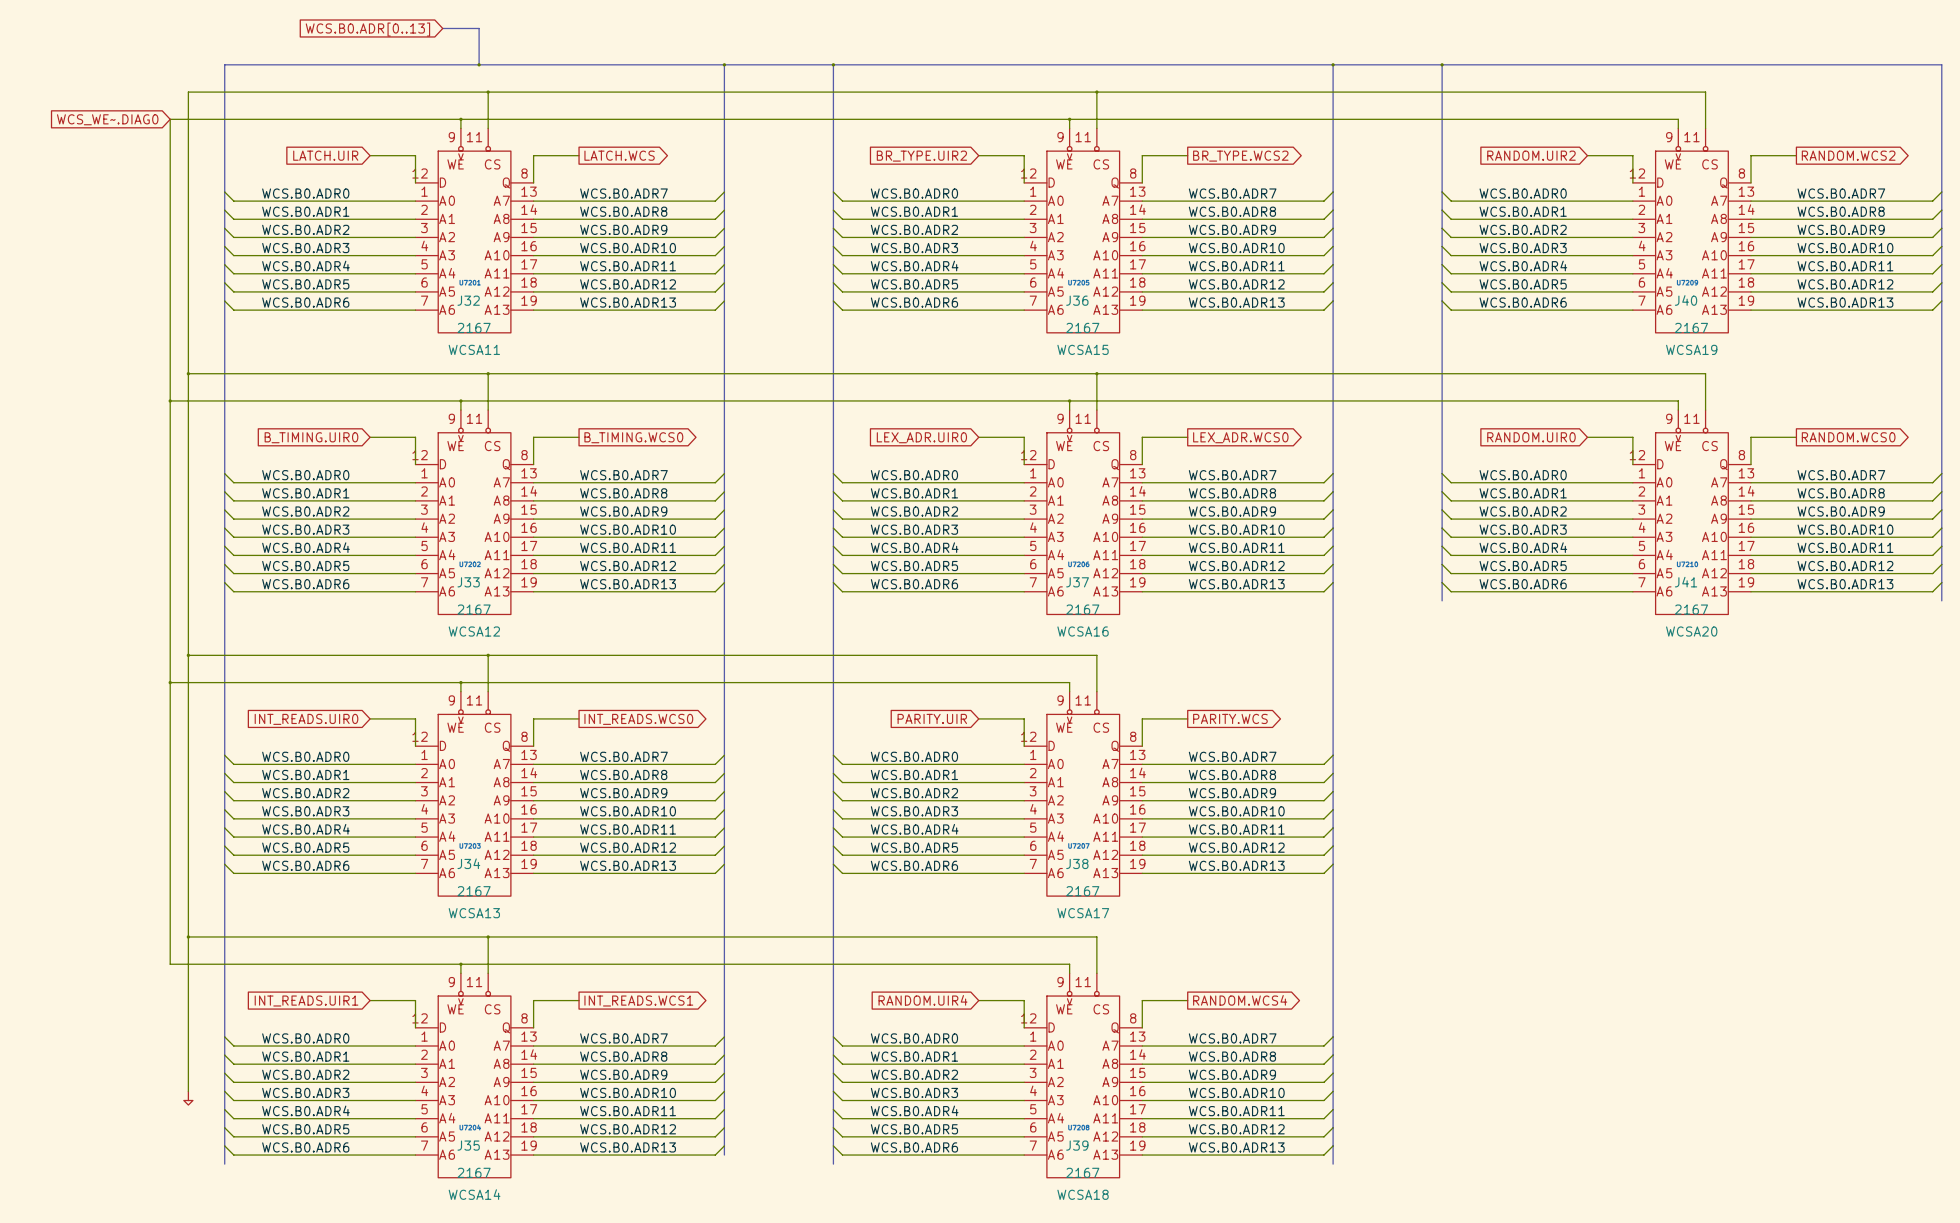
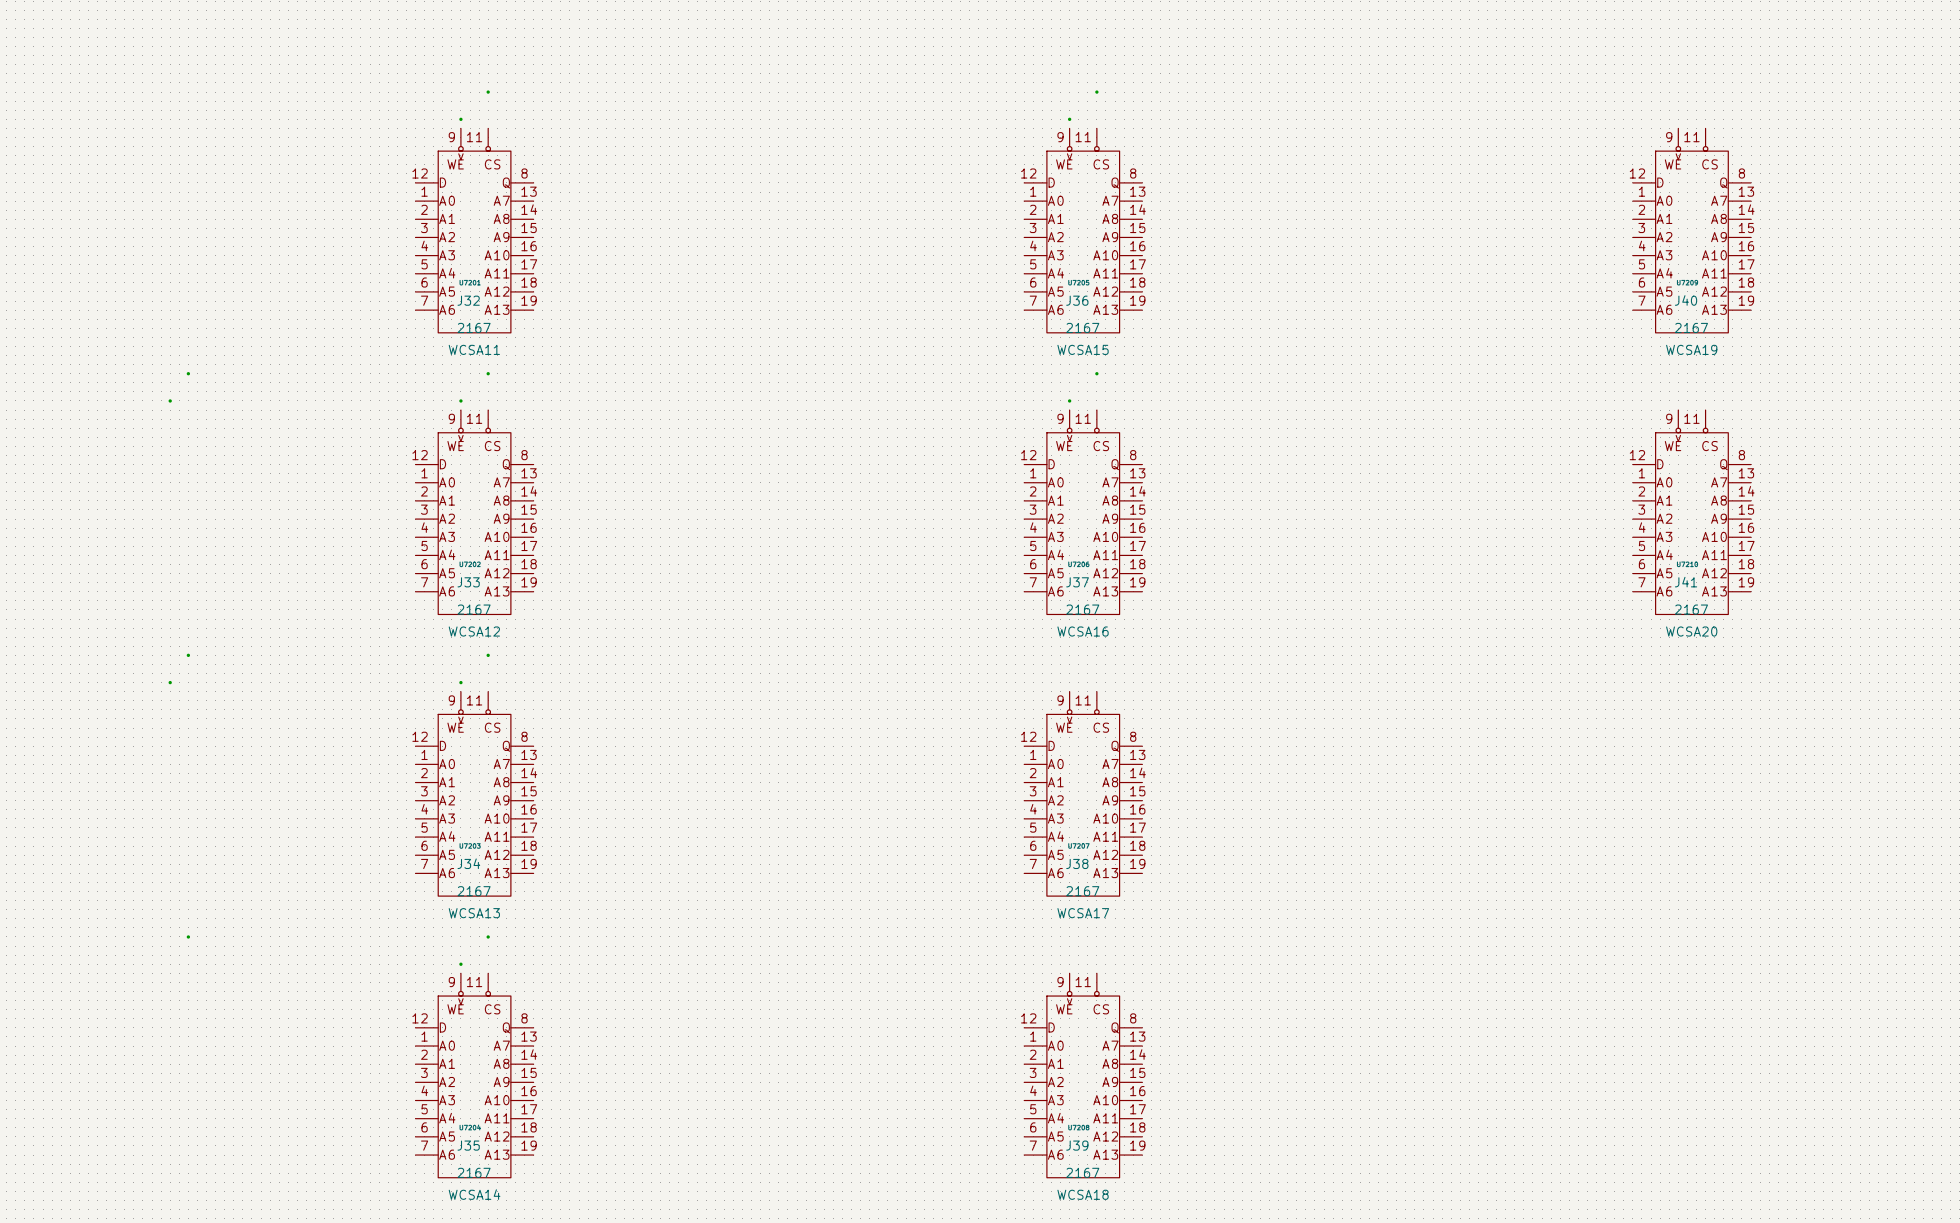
bus: (442, 28) (479, 28) (479, 64) -> none
global label: WCS.B0.ADR[0..13] (367, 29) -> none
junction: (479, 64) -> none
bus: (724, 64) (724, 1155) -> none
junction: (724, 64) -> none
bus: (833, 64) (833, 1164) -> none
junction: (833, 64) -> none
bus: (1333, 64) (1333, 1164) -> none
junction: (1333, 64) -> none
bus: (1442, 64) (1442, 600) -> none
junction: (1442, 64) -> none
wire: (488, 92) (488, 128) -> none
wire: (1096, 92) (1096, 128) -> none
global label: WCS_WE~.DIAG0 (107, 119) -> none
wire: (460, 119) (460, 128) -> none
wire: (1069, 119) (1069, 128) -> none
wire: (1678, 128) (1678, 119) (170, 119) (170, 964) (1069, 964) (1069, 973) -> none
wire: (1705, 128) (1705, 92) (188, 92) (188, 1091) -> none
global label: LATCH.UIR (325, 155) -> none
wire: (370, 155) (415, 155) (415, 182) -> none
wire: (579, 155) (533, 155) (533, 182) -> none
global label: LATCH.WCS (619, 155) -> none
wire: (978, 155) (1024, 155) (1024, 182) -> none
wire: (1187, 155) (1142, 155) (1142, 182) -> none
global label: RANDOM.UIR2 (1531, 155) -> none
wire: (1587, 155) (1632, 155) (1632, 182) -> none
wire: (1796, 155) (1751, 155) (1751, 182) -> none
global label: RANDOM.WCS2 (1848, 155) -> none
global label: BR_TYPE.UIR2 (921, 156) -> none
global label: BR_TYPE.WCS2 (1240, 156) -> none
wire: (224, 192) (233, 201) (415, 201) -> none
wire: (724, 192) (715, 201) (533, 201) -> none
wire: (833, 192) (842, 201) (1024, 201) -> none
wire: (1333, 192) (1324, 201) (1142, 201) -> none
wire: (1442, 192) (1451, 201) (1632, 201) -> none
wire: (1941, 192) (1932, 201) (1751, 201) -> none
label: WCS.B0.ADR0 (305, 193) -> none
label: WCS.B0.ADR7 (623, 193) -> none
label: WCS.B0.ADR0 (914, 193) -> none
label: WCS.B0.ADR7 (1232, 193) -> none
label: WCS.B0.ADR0 (1523, 193) -> none
label: WCS.B0.ADR7 (1841, 193) -> none
wire: (224, 210) (233, 219) (415, 219) -> none
wire: (724, 210) (715, 219) (533, 219) -> none
wire: (833, 210) (842, 219) (1024, 219) -> none
wire: (1333, 210) (1324, 219) (1142, 219) -> none
wire: (1442, 210) (1451, 219) (1632, 219) -> none
wire: (1941, 210) (1932, 219) (1751, 219) -> none
label: WCS.B0.ADR1 (305, 211) -> none
label: WCS.B0.ADR8 (623, 211) -> none
label: WCS.B0.ADR1 (914, 211) -> none
label: WCS.B0.ADR8 (1232, 211) -> none
label: WCS.B0.ADR1 (1523, 211) -> none
label: WCS.B0.ADR8 (1841, 211) -> none
wire: (224, 228) (233, 237) (415, 237) -> none
wire: (724, 228) (715, 237) (533, 237) -> none
wire: (833, 228) (842, 237) (1024, 237) -> none
wire: (1333, 228) (1324, 237) (1142, 237) -> none
wire: (1442, 228) (1451, 237) (1632, 237) -> none
wire: (1941, 228) (1932, 237) (1751, 237) -> none
label: WCS.B0.ADR2 (305, 229) -> none
label: WCS.B0.ADR9 (623, 229) -> none
label: WCS.B0.ADR2 (914, 229) -> none
label: WCS.B0.ADR9 (1232, 229) -> none
label: WCS.B0.ADR2 (1523, 229) -> none
label: WCS.B0.ADR9 (1841, 229) -> none
wire: (224, 246) (233, 255) (415, 255) -> none
wire: (724, 246) (715, 255) (533, 255) -> none
wire: (833, 246) (842, 255) (1024, 255) -> none
wire: (1333, 246) (1324, 255) (1142, 255) -> none
wire: (1442, 246) (1451, 255) (1632, 255) -> none
wire: (1941, 246) (1932, 255) (1751, 255) -> none
label: WCS.B0.ADR3 (305, 248) -> none
label: WCS.B0.ADR10 (628, 248) -> none
label: WCS.B0.ADR3 (914, 248) -> none
label: WCS.B0.ADR10 (1236, 248) -> none
label: WCS.B0.ADR3 (1523, 248) -> none
label: WCS.B0.ADR10 (1845, 248) -> none
wire: (224, 264) (233, 273) (415, 273) -> none
wire: (724, 264) (715, 273) (533, 273) -> none
wire: (833, 264) (842, 273) (1024, 273) -> none
wire: (1333, 264) (1324, 273) (1142, 273) -> none
wire: (1442, 264) (1451, 273) (1632, 273) -> none
wire: (1941, 264) (1932, 273) (1751, 273) -> none
label: WCS.B0.ADR4 (305, 266) -> none
label: WCS.B0.ADR11 (628, 266) -> none
label: WCS.B0.ADR4 (914, 266) -> none
label: WCS.B0.ADR11 (1236, 266) -> none
label: WCS.B0.ADR4 (1523, 266) -> none
label: WCS.B0.ADR11 (1845, 266) -> none
wire: (224, 282) (233, 291) (415, 291) -> none
wire: (724, 282) (715, 291) (533, 291) -> none
wire: (833, 282) (842, 291) (1024, 291) -> none
wire: (1333, 282) (1324, 291) (1142, 291) -> none
wire: (1442, 282) (1451, 291) (1632, 291) -> none
wire: (1941, 282) (1932, 291) (1751, 291) -> none
label: WCS.B0.ADR5 (305, 284) -> none
label: WCS.B0.ADR12 (628, 284) -> none
label: WCS.B0.ADR5 (914, 284) -> none
label: WCS.B0.ADR12 (1236, 284) -> none
label: WCS.B0.ADR5 (1523, 284) -> none
label: WCS.B0.ADR12 (1845, 284) -> none
wire: (224, 301) (233, 310) (415, 310) -> none
wire: (724, 301) (715, 310) (533, 310) -> none
wire: (833, 301) (842, 310) (1024, 310) -> none
wire: (1333, 301) (1324, 310) (1142, 310) -> none
wire: (1442, 301) (1451, 310) (1632, 310) -> none
wire: (1941, 301) (1932, 310) (1751, 310) -> none
label: WCS.B0.ADR6 (305, 302) -> none
label: WCS.B0.ADR13 (628, 302) -> none
label: WCS.B0.ADR6 (914, 302) -> none
label: WCS.B0.ADR13 (1236, 302) -> none
label: WCS.B0.ADR6 (1523, 302) -> none
label: WCS.B0.ADR13 (1845, 302) -> none
wire: (188, 373) (1705, 373) (1705, 410) -> none
wire: (488, 373) (488, 410) -> none
wire: (1096, 373) (1096, 410) -> none
wire: (170, 400) (1678, 400) (1678, 410) -> none
wire: (460, 400) (460, 410) -> none
wire: (1069, 400) (1069, 410) -> none
global label: B_TIMING.UIR0 (311, 437) -> none
wire: (370, 437) (415, 437) (415, 464) -> none
wire: (579, 437) (533, 437) (533, 464) -> none
global label: B_TIMING.WCS0 (633, 437) -> none
global label: LEX_ADR.UIR0 (921, 437) -> none
wire: (978, 437) (1024, 437) (1024, 464) -> none
wire: (1187, 437) (1142, 437) (1142, 464) -> none
global label: LEX_ADR.WCS0 (1240, 437) -> none
global label: RANDOM.UIR0 (1531, 437) -> none
wire: (1587, 437) (1632, 437) (1632, 464) -> none
wire: (1796, 437) (1751, 437) (1751, 464) -> none
global label: RANDOM.WCS0 (1848, 437) -> none
wire: (224, 473) (233, 482) (415, 482) -> none
wire: (724, 473) (715, 482) (533, 482) -> none
wire: (833, 473) (842, 482) (1024, 482) -> none
wire: (1333, 473) (1324, 482) (1142, 482) -> none
wire: (1442, 473) (1451, 482) (1632, 482) -> none
wire: (1941, 473) (1932, 482) (1751, 482) -> none
label: WCS.B0.ADR0 (305, 475) -> none
label: WCS.B0.ADR7 (623, 475) -> none
label: WCS.B0.ADR0 (914, 475) -> none
label: WCS.B0.ADR7 (1232, 475) -> none
label: WCS.B0.ADR0 (1523, 475) -> none
label: WCS.B0.ADR7 (1841, 475) -> none
wire: (224, 491) (233, 500) (415, 500) -> none
wire: (724, 491) (715, 500) (533, 500) -> none
wire: (833, 491) (842, 500) (1024, 500) -> none
wire: (1333, 491) (1324, 500) (1142, 500) -> none
wire: (1442, 491) (1451, 500) (1632, 500) -> none
wire: (1941, 491) (1932, 500) (1751, 500) -> none
label: WCS.B0.ADR1 (305, 493) -> none
label: WCS.B0.ADR8 (623, 493) -> none
label: WCS.B0.ADR1 (914, 493) -> none
label: WCS.B0.ADR8 (1232, 493) -> none
label: WCS.B0.ADR1 (1523, 493) -> none
label: WCS.B0.ADR8 (1841, 493) -> none
wire: (224, 509) (233, 519) (415, 519) -> none
wire: (724, 509) (715, 519) (533, 519) -> none
wire: (833, 509) (842, 519) (1024, 519) -> none
wire: (1333, 509) (1324, 519) (1142, 519) -> none
wire: (1442, 509) (1451, 519) (1632, 519) -> none
wire: (1941, 509) (1932, 519) (1751, 519) -> none
label: WCS.B0.ADR2 (305, 511) -> none
label: WCS.B0.ADR9 (623, 511) -> none
label: WCS.B0.ADR2 (914, 511) -> none
label: WCS.B0.ADR9 (1232, 511) -> none
label: WCS.B0.ADR2 (1523, 511) -> none
label: WCS.B0.ADR9 (1841, 511) -> none
wire: (224, 528) (233, 537) (415, 537) -> none
wire: (724, 528) (715, 537) (533, 537) -> none
wire: (833, 528) (842, 537) (1024, 537) -> none
wire: (1333, 528) (1324, 537) (1142, 537) -> none
wire: (1442, 528) (1451, 537) (1632, 537) -> none
wire: (1941, 528) (1932, 537) (1751, 537) -> none
label: WCS.B0.ADR3 (305, 529) -> none
label: WCS.B0.ADR10 (628, 529) -> none
label: WCS.B0.ADR3 (914, 529) -> none
label: WCS.B0.ADR10 (1236, 529) -> none
label: WCS.B0.ADR3 (1523, 529) -> none
label: WCS.B0.ADR10 (1845, 529) -> none
wire: (224, 546) (233, 555) (415, 555) -> none
wire: (724, 546) (715, 555) (533, 555) -> none
wire: (833, 546) (842, 555) (1024, 555) -> none
wire: (1333, 546) (1324, 555) (1142, 555) -> none
wire: (1442, 546) (1451, 555) (1632, 555) -> none
wire: (1941, 546) (1932, 555) (1751, 555) -> none
label: WCS.B0.ADR4 (305, 547) -> none
label: WCS.B0.ADR11 (628, 547) -> none
label: WCS.B0.ADR4 (914, 547) -> none
label: WCS.B0.ADR11 (1236, 547) -> none
label: WCS.B0.ADR4 (1523, 547) -> none
label: WCS.B0.ADR11 (1845, 547) -> none
wire: (224, 564) (233, 573) (415, 573) -> none
wire: (724, 564) (715, 573) (533, 573) -> none
wire: (833, 564) (842, 573) (1024, 573) -> none
wire: (1333, 564) (1324, 573) (1142, 573) -> none
wire: (1442, 564) (1451, 573) (1632, 573) -> none
wire: (1941, 564) (1932, 573) (1751, 573) -> none
label: WCS.B0.ADR5 (305, 566) -> none
label: WCS.B0.ADR12 (628, 566) -> none
label: WCS.B0.ADR5 (914, 566) -> none
label: WCS.B0.ADR12 (1236, 566) -> none
label: WCS.B0.ADR5 (1523, 566) -> none
label: WCS.B0.ADR12 (1845, 566) -> none
wire: (224, 582) (233, 591) (415, 591) -> none
wire: (724, 582) (715, 591) (533, 591) -> none
wire: (833, 582) (842, 591) (1024, 591) -> none
wire: (1333, 582) (1324, 591) (1142, 591) -> none
wire: (1442, 582) (1451, 591) (1632, 591) -> none
wire: (1941, 582) (1932, 591) (1751, 591) -> none
label: WCS.B0.ADR6 (305, 584) -> none
label: WCS.B0.ADR13 (628, 584) -> none
label: WCS.B0.ADR6 (914, 584) -> none
label: WCS.B0.ADR13 (1236, 584) -> none
label: WCS.B0.ADR6 (1523, 584) -> none
label: WCS.B0.ADR13 (1845, 584) -> none
bus: (1941, 600) (1941, 64) (224, 64) (224, 1164) -> none
wire: (188, 655) (1096, 655) (1096, 691) -> none
wire: (488, 655) (488, 691) -> none
wire: (170, 682) (1069, 682) (1069, 691) -> none
wire: (460, 682) (460, 691) -> none
wire: (370, 718) (415, 718) (415, 746) -> none
wire: (579, 718) (533, 718) (533, 746) -> none
global label: PARITY.UIR (932, 718) -> none
wire: (978, 718) (1024, 718) (1024, 746) -> none
wire: (1187, 718) (1142, 718) (1142, 746) -> none
global label: PARITY.WCS (1230, 718) -> none
global label: INT_READS.UIR0 (306, 719) -> none
global label: INT_READS.WCS0 (638, 719) -> none
wire: (224, 755) (233, 764) (415, 764) -> none
wire: (724, 755) (715, 764) (533, 764) -> none
wire: (833, 755) (842, 764) (1024, 764) -> none
wire: (1333, 755) (1324, 764) (1142, 764) -> none
label: WCS.B0.ADR0 (305, 756) -> none
label: WCS.B0.ADR7 (623, 756) -> none
label: WCS.B0.ADR0 (914, 756) -> none
label: WCS.B0.ADR7 (1232, 756) -> none
wire: (224, 773) (233, 782) (415, 782) -> none
wire: (724, 773) (715, 782) (533, 782) -> none
wire: (833, 773) (842, 782) (1024, 782) -> none
wire: (1333, 773) (1324, 782) (1142, 782) -> none
label: WCS.B0.ADR1 (305, 774) -> none
label: WCS.B0.ADR8 (623, 774) -> none
label: WCS.B0.ADR1 (914, 774) -> none
label: WCS.B0.ADR8 (1232, 774) -> none
wire: (224, 791) (233, 800) (415, 800) -> none
wire: (724, 791) (715, 800) (533, 800) -> none
wire: (833, 791) (842, 800) (1024, 800) -> none
wire: (1333, 791) (1324, 800) (1142, 800) -> none
label: WCS.B0.ADR2 (305, 793) -> none
label: WCS.B0.ADR9 (623, 793) -> none
label: WCS.B0.ADR2 (914, 793) -> none
label: WCS.B0.ADR9 (1232, 793) -> none
wire: (224, 809) (233, 818) (415, 818) -> none
wire: (724, 809) (715, 818) (533, 818) -> none
wire: (833, 809) (842, 818) (1024, 818) -> none
wire: (1333, 809) (1324, 818) (1142, 818) -> none
label: WCS.B0.ADR3 (305, 811) -> none
label: WCS.B0.ADR10 (628, 811) -> none
label: WCS.B0.ADR3 (914, 811) -> none
label: WCS.B0.ADR10 (1236, 811) -> none
wire: (224, 827) (233, 837) (415, 837) -> none
wire: (724, 827) (715, 837) (533, 837) -> none
wire: (833, 827) (842, 837) (1024, 837) -> none
wire: (1333, 827) (1324, 837) (1142, 837) -> none
label: WCS.B0.ADR4 (305, 829) -> none
label: WCS.B0.ADR11 (628, 829) -> none
label: WCS.B0.ADR4 (914, 829) -> none
label: WCS.B0.ADR11 (1236, 829) -> none
wire: (224, 846) (233, 855) (415, 855) -> none
wire: (724, 846) (715, 855) (533, 855) -> none
wire: (833, 846) (842, 855) (1024, 855) -> none
wire: (1333, 846) (1324, 855) (1142, 855) -> none
label: WCS.B0.ADR5 (305, 847) -> none
label: WCS.B0.ADR12 (628, 847) -> none
label: WCS.B0.ADR5 (914, 847) -> none
label: WCS.B0.ADR12 (1236, 847) -> none
wire: (224, 864) (233, 873) (415, 873) -> none
wire: (724, 864) (715, 873) (533, 873) -> none
wire: (833, 864) (842, 873) (1024, 873) -> none
wire: (1333, 864) (1324, 873) (1142, 873) -> none
label: WCS.B0.ADR6 (305, 865) -> none
label: WCS.B0.ADR13 (628, 865) -> none
label: WCS.B0.ADR6 (914, 865) -> none
label: WCS.B0.ADR13 (1236, 865) -> none
wire: (188, 936) (1096, 936) (1096, 973) -> none
wire: (488, 936) (488, 973) -> none
wire: (460, 964) (460, 973) -> none
wire: (370, 1000) (415, 1000) (415, 1027) -> none
wire: (579, 1000) (533, 1000) (533, 1027) -> none
global label: RANDOM.UIR4 (922, 1000) -> none
wire: (978, 1000) (1024, 1000) (1024, 1027) -> none
wire: (1187, 1000) (1142, 1000) (1142, 1027) -> none
global label: RANDOM.WCS4 (1240, 1000) -> none
global label: INT_READS.UIR1 (306, 1001) -> none
global label: INT_READS.WCS1 (638, 1001) -> none
wire: (224, 1036) (233, 1046) (415, 1046) -> none
wire: (724, 1036) (715, 1046) (533, 1046) -> none
wire: (833, 1036) (842, 1046) (1024, 1046) -> none
wire: (1333, 1036) (1324, 1046) (1142, 1046) -> none
label: WCS.B0.ADR0 (305, 1038) -> none
label: WCS.B0.ADR7 (623, 1038) -> none
label: WCS.B0.ADR0 (914, 1038) -> none
label: WCS.B0.ADR7 (1232, 1038) -> none
wire: (224, 1055) (233, 1064) (415, 1064) -> none
wire: (724, 1055) (715, 1064) (533, 1064) -> none
wire: (833, 1055) (842, 1064) (1024, 1064) -> none
wire: (1333, 1055) (1324, 1064) (1142, 1064) -> none
label: WCS.B0.ADR1 (305, 1056) -> none
label: WCS.B0.ADR8 (623, 1056) -> none
label: WCS.B0.ADR1 (914, 1056) -> none
label: WCS.B0.ADR8 (1232, 1056) -> none
wire: (224, 1073) (233, 1082) (415, 1082) -> none
wire: (724, 1073) (715, 1082) (533, 1082) -> none
wire: (833, 1073) (842, 1082) (1024, 1082) -> none
wire: (1333, 1073) (1324, 1082) (1142, 1082) -> none
label: WCS.B0.ADR2 (305, 1074) -> none
label: WCS.B0.ADR9 (623, 1074) -> none
label: WCS.B0.ADR2 (914, 1074) -> none
label: WCS.B0.ADR9 (1232, 1074) -> none
wire: (224, 1091) (233, 1100) (415, 1100) -> none
wire: (724, 1091) (715, 1100) (533, 1100) -> none
wire: (833, 1091) (842, 1100) (1024, 1100) -> none
wire: (1333, 1091) (1324, 1100) (1142, 1100) -> none
label: WCS.B0.ADR3 (305, 1092) -> none
label: WCS.B0.ADR10 (628, 1092) -> none
label: WCS.B0.ADR3 (914, 1092) -> none
label: WCS.B0.ADR10 (1236, 1092) -> none
power symbol: (188, 1098) -> none
wire: (224, 1109) (233, 1118) (415, 1118) -> none
wire: (724, 1109) (715, 1118) (533, 1118) -> none
wire: (833, 1109) (842, 1118) (1024, 1118) -> none
wire: (1333, 1109) (1324, 1118) (1142, 1118) -> none
label: WCS.B0.ADR4 (305, 1110) -> none
label: WCS.B0.ADR4 (914, 1110) -> none
label: WCS.B0.ADR11 (628, 1111) -> none
label: WCS.B0.ADR11 (1236, 1111) -> none
wire: (224, 1127) (233, 1136) (415, 1136) -> none
wire: (724, 1127) (715, 1136) (533, 1136) -> none
wire: (833, 1127) (842, 1136) (1024, 1136) -> none
wire: (1333, 1127) (1324, 1136) (1142, 1136) -> none
label: WCS.B0.ADR5 (305, 1129) -> none
label: WCS.B0.ADR12 (628, 1129) -> none
label: WCS.B0.ADR5 (914, 1129) -> none
label: WCS.B0.ADR12 (1236, 1129) -> none
wire: (224, 1145) (233, 1155) (415, 1155) -> none
wire: (724, 1145) (715, 1155) (533, 1155) -> none
wire: (833, 1145) (842, 1155) (1024, 1155) -> none
wire: (1333, 1145) (1324, 1155) (1142, 1155) -> none
label: WCS.B0.ADR6 (305, 1147) -> none
label: WCS.B0.ADR13 (628, 1147) -> none
label: WCS.B0.ADR6 (914, 1147) -> none
label: WCS.B0.ADR13 (1236, 1147) -> none

